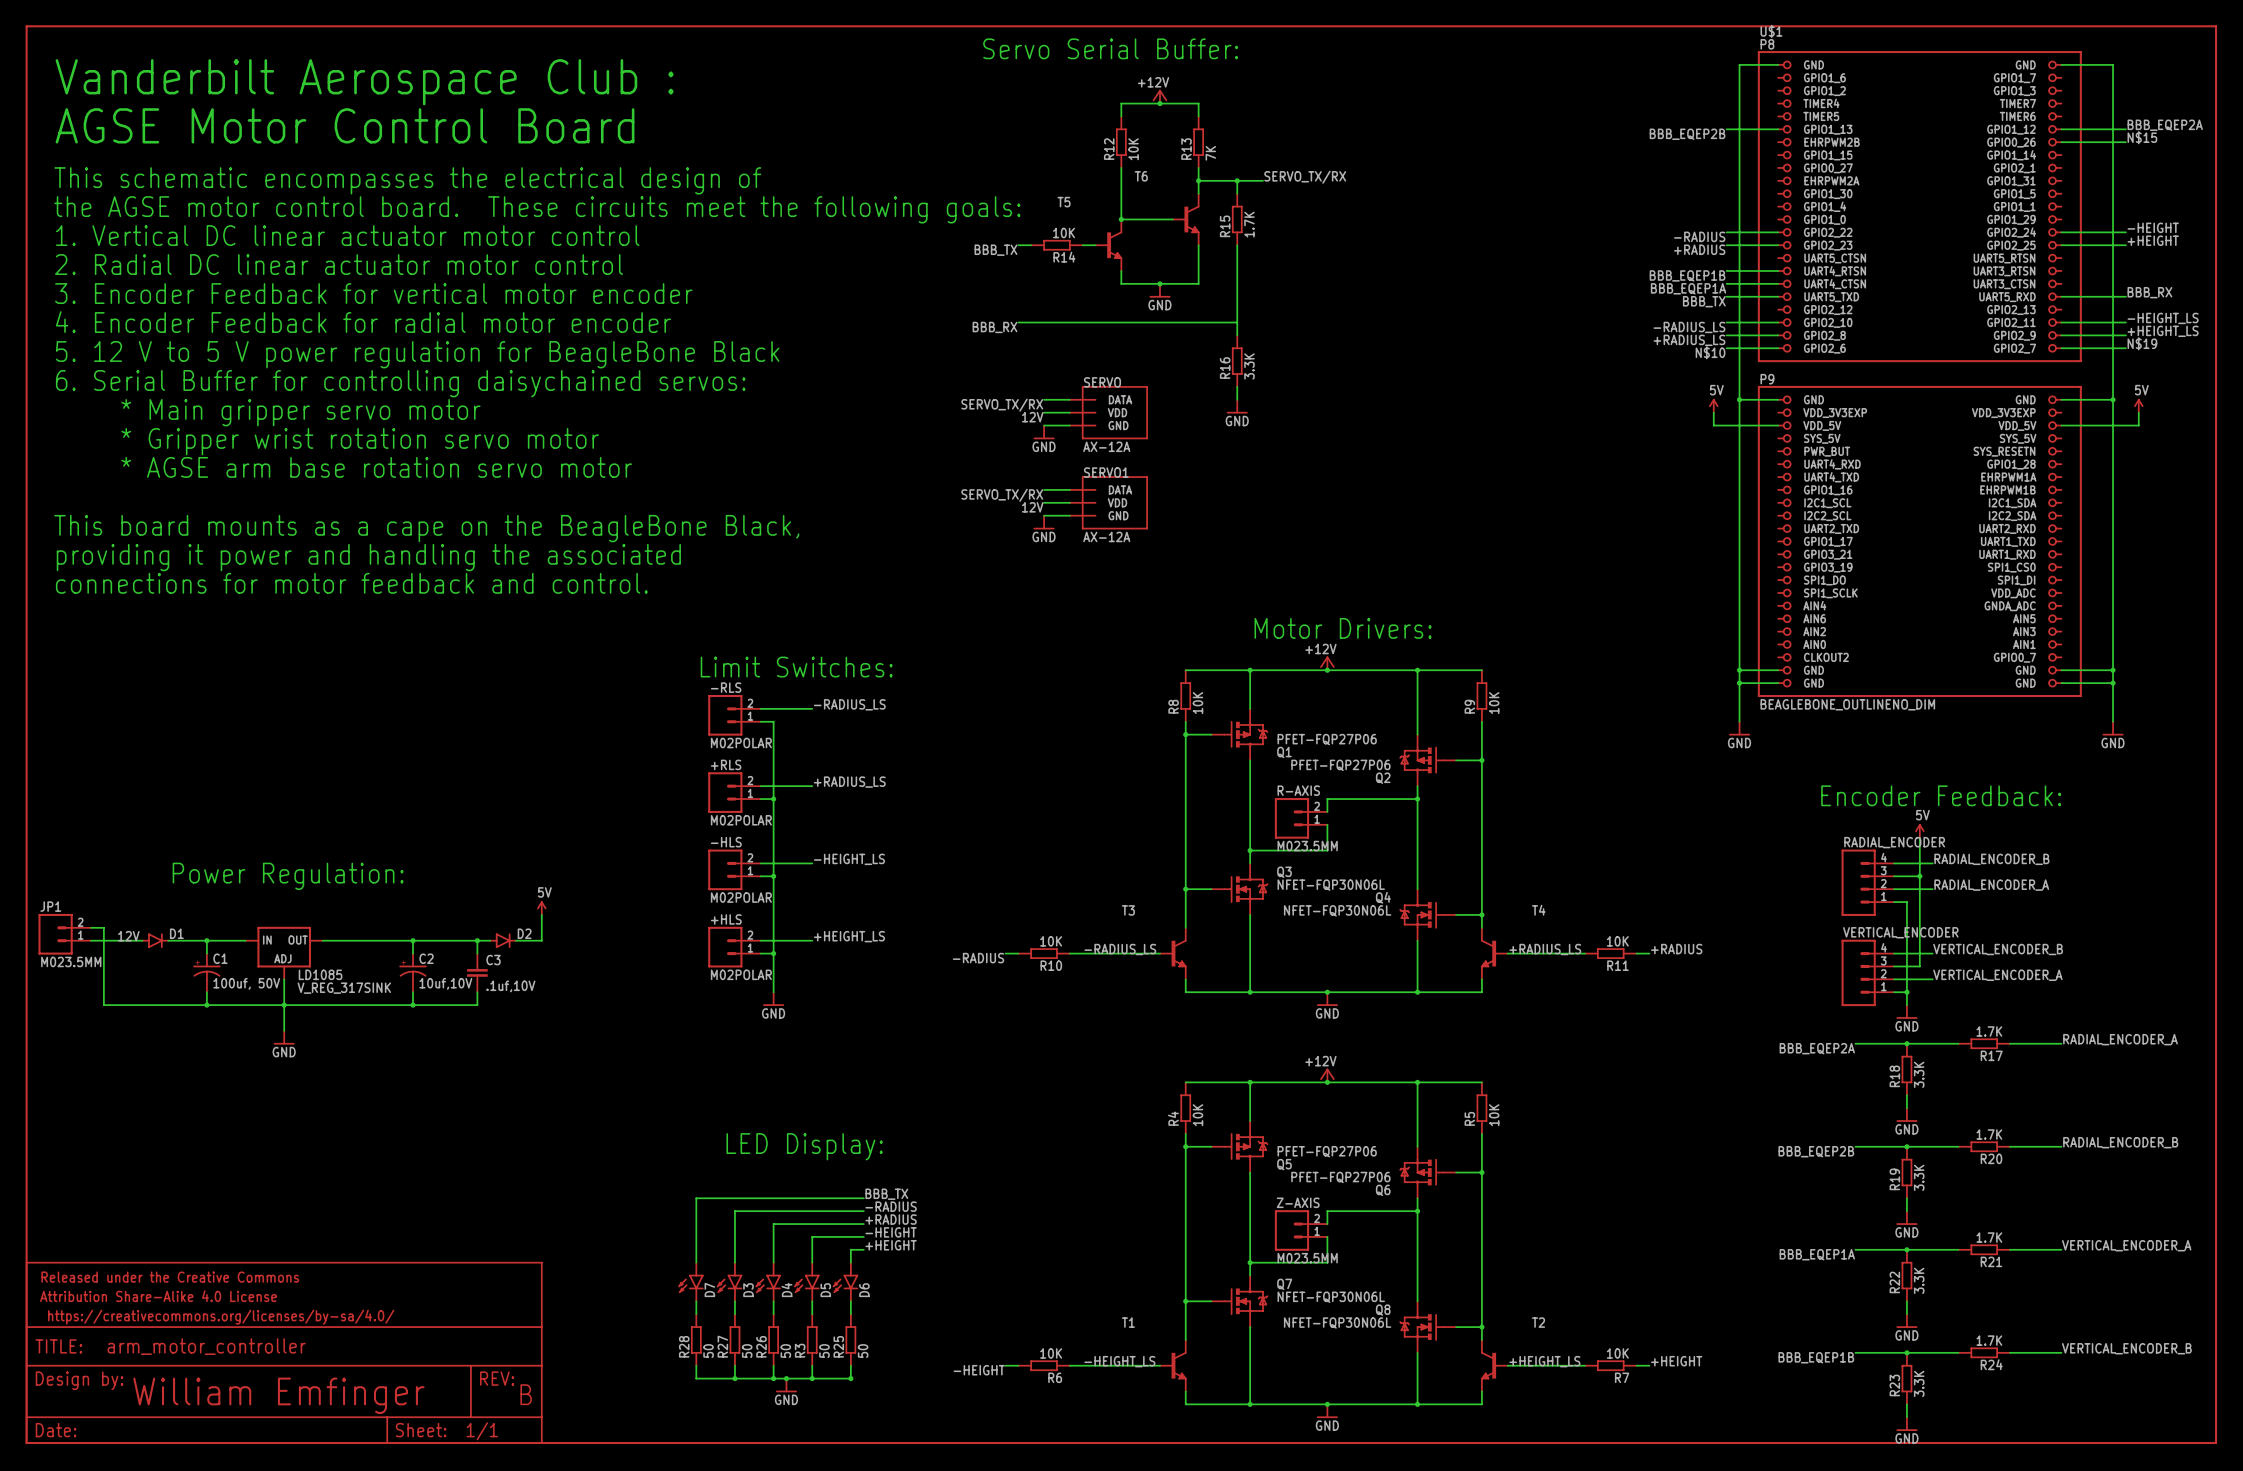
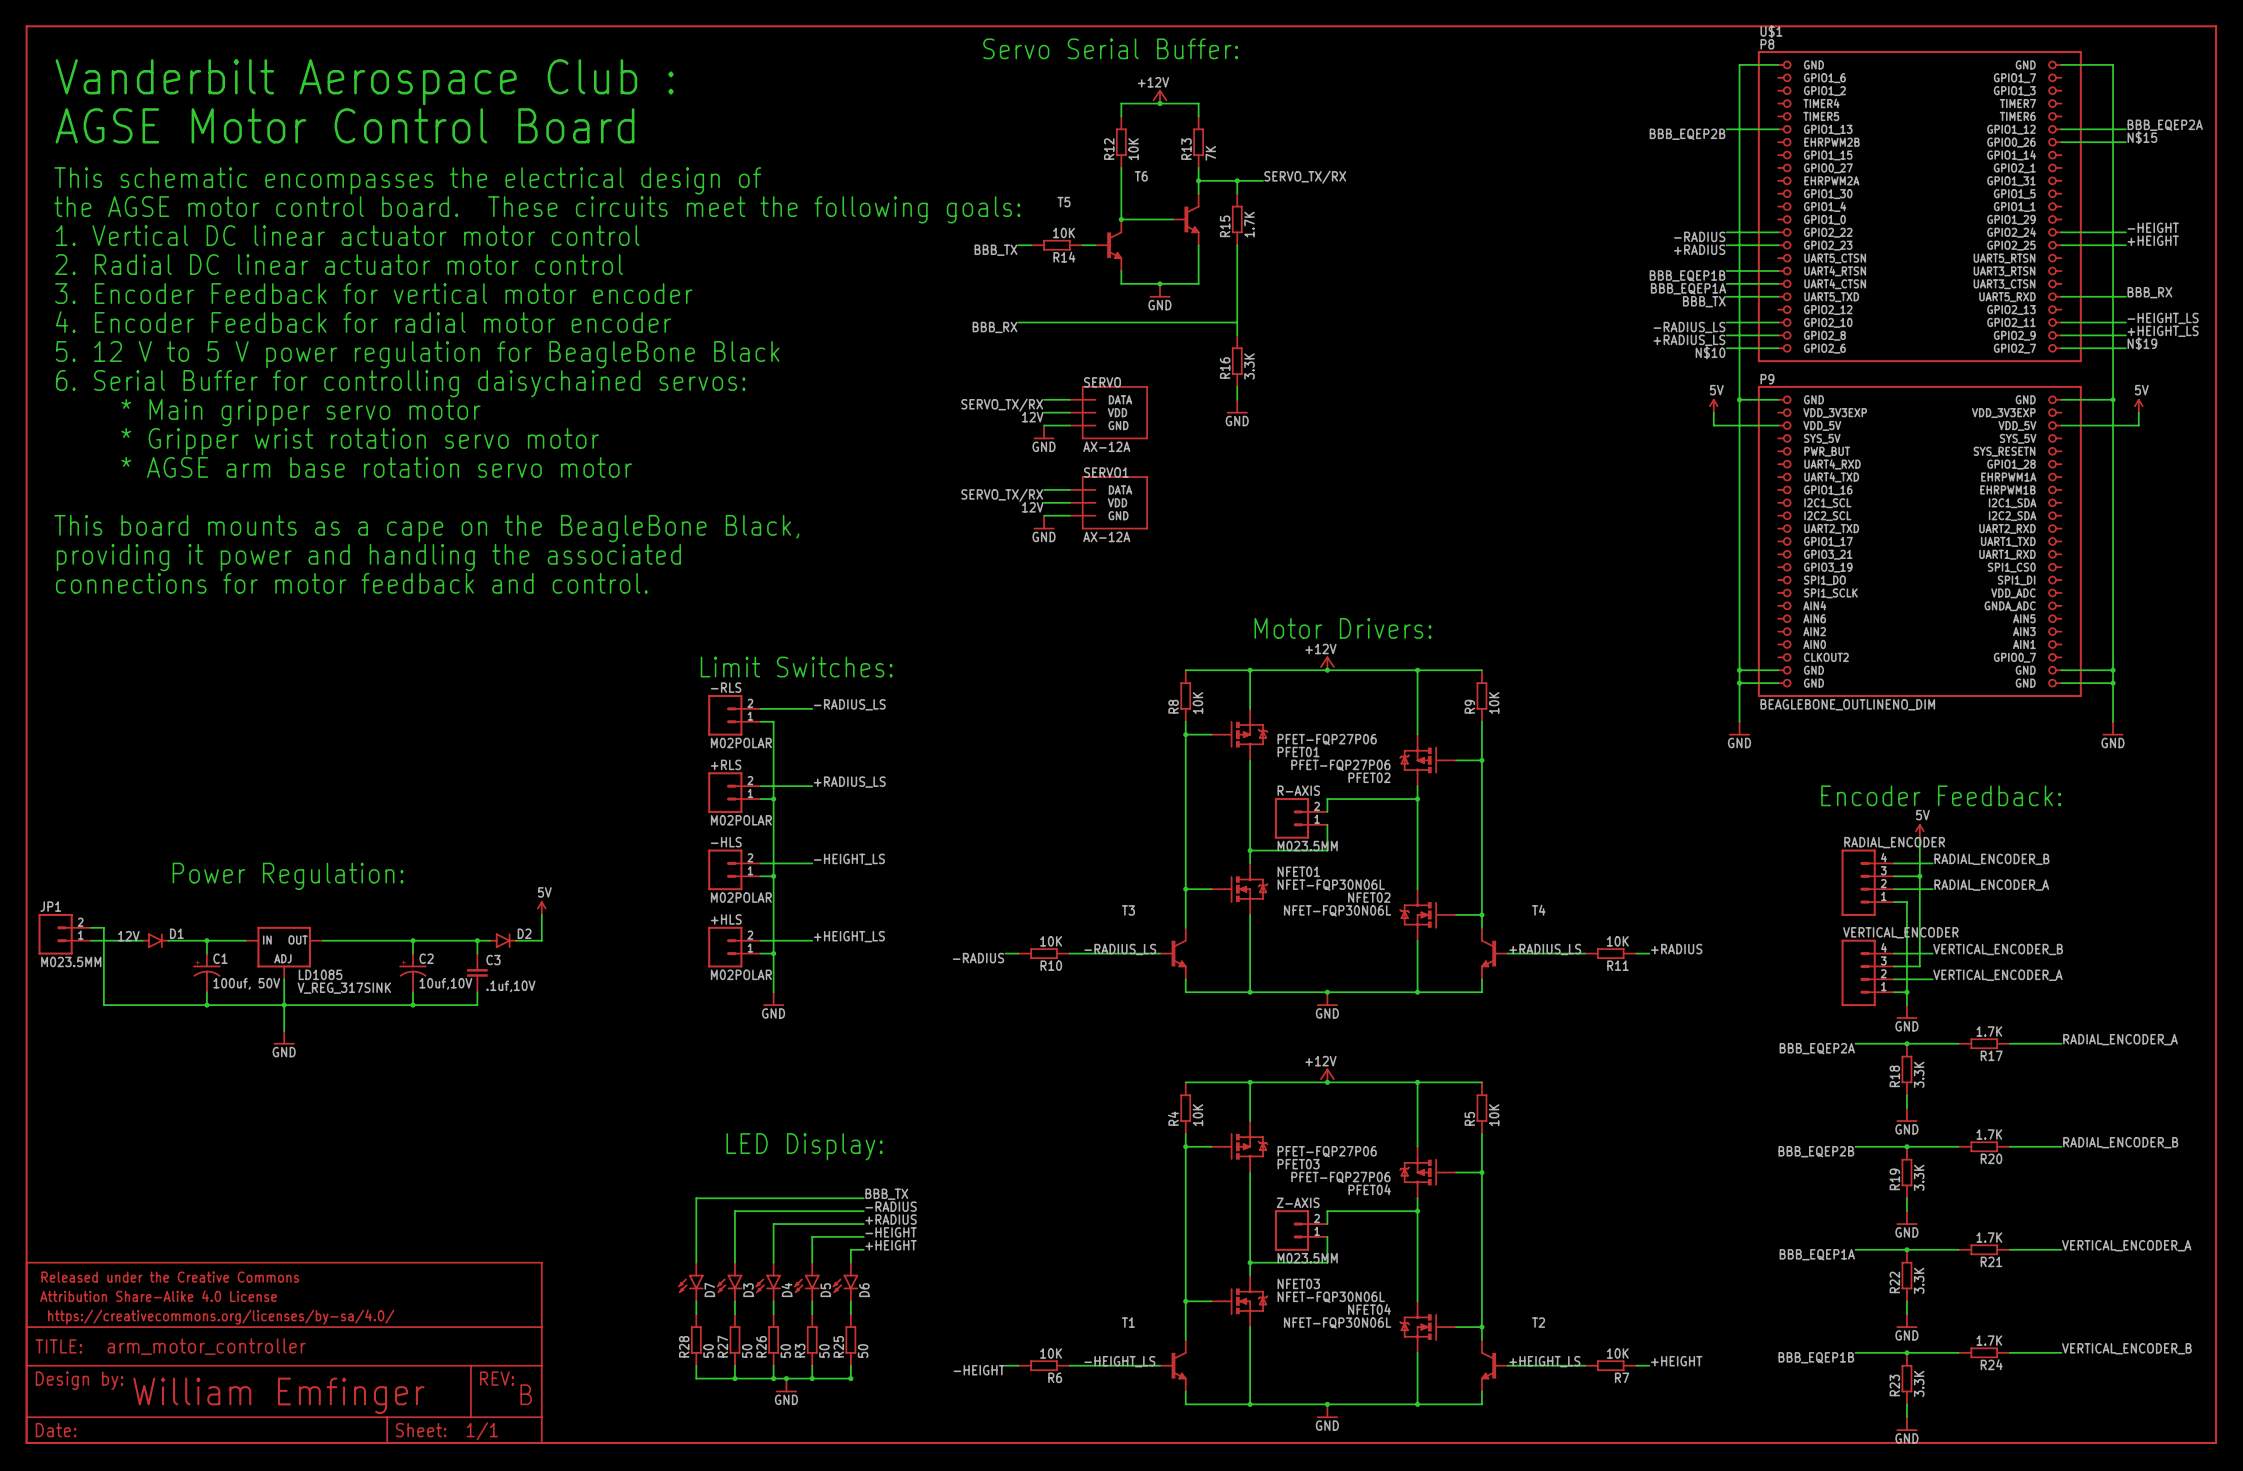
Q1 name: Q1 (1284, 752) -> PFET01 (1298, 752)
Q2 name: Q2 (1383, 778) -> PFET02 (1369, 777)
Q3 name: Q3 (1284, 872) -> NFET01 (1298, 871)
Q4 name: Q4 (1383, 897) -> NFET02 (1369, 897)
Q5 name: Q5 (1284, 1164) -> PFET03 (1298, 1164)
Q6 name: Q6 (1383, 1190) -> PFET04 (1369, 1189)
Q7 name: Q7 (1284, 1284) -> NFET03 (1298, 1283)
Q8 name: Q8 (1383, 1310) -> NFET04 (1369, 1309)

